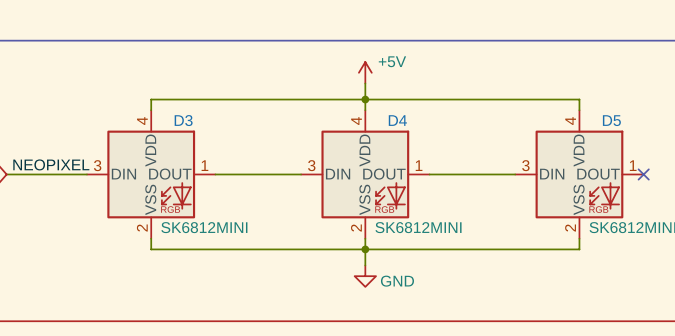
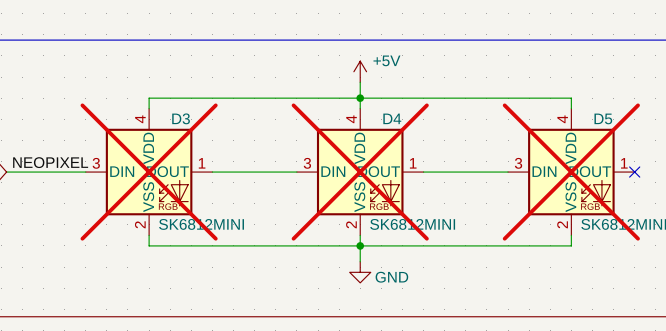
D3 do-not-place cross: none -> (149, 172)
D4 do-not-place cross: none -> (360, 172)
D5 do-not-place cross: none -> (571, 172)

